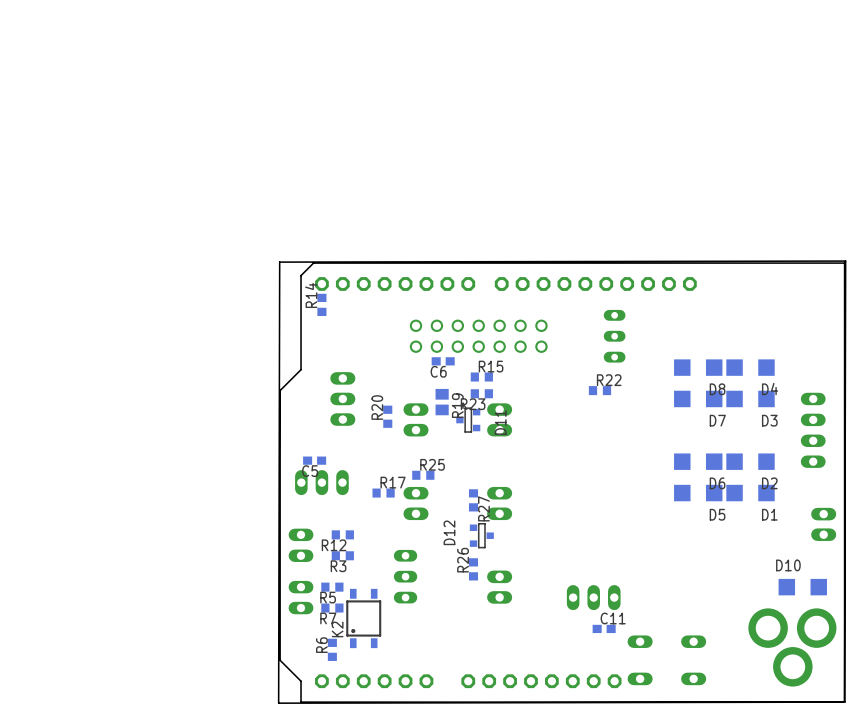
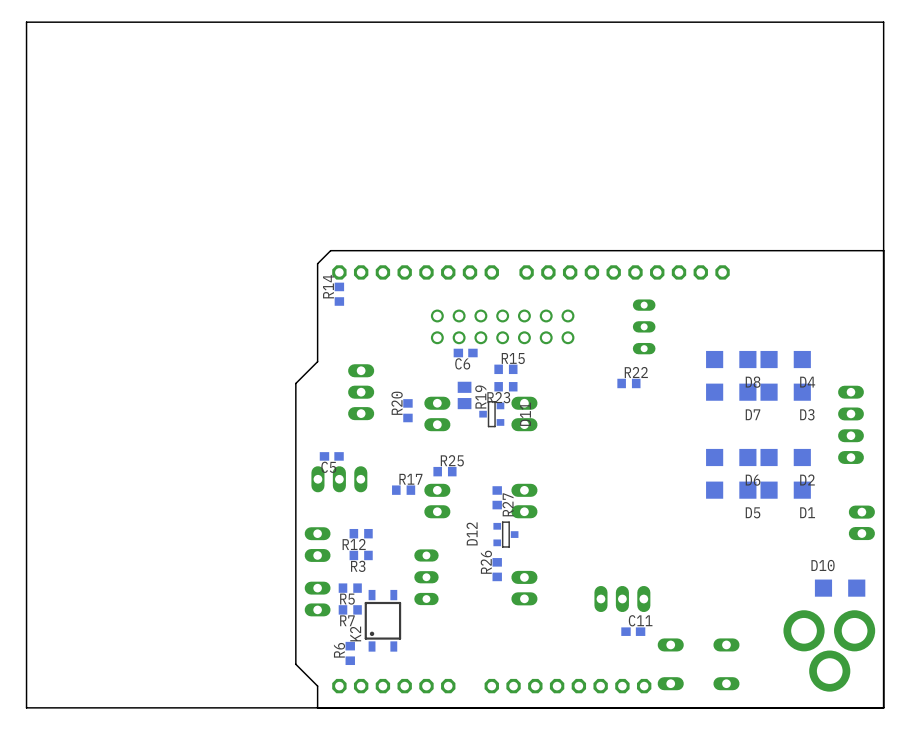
board edge: none -> (883, 22) (26, 22) (26, 707) (883, 707) (883, 22)
board edge: (845, 261) (279, 262) (278, 703) (844, 702) (845, 261) -> none

